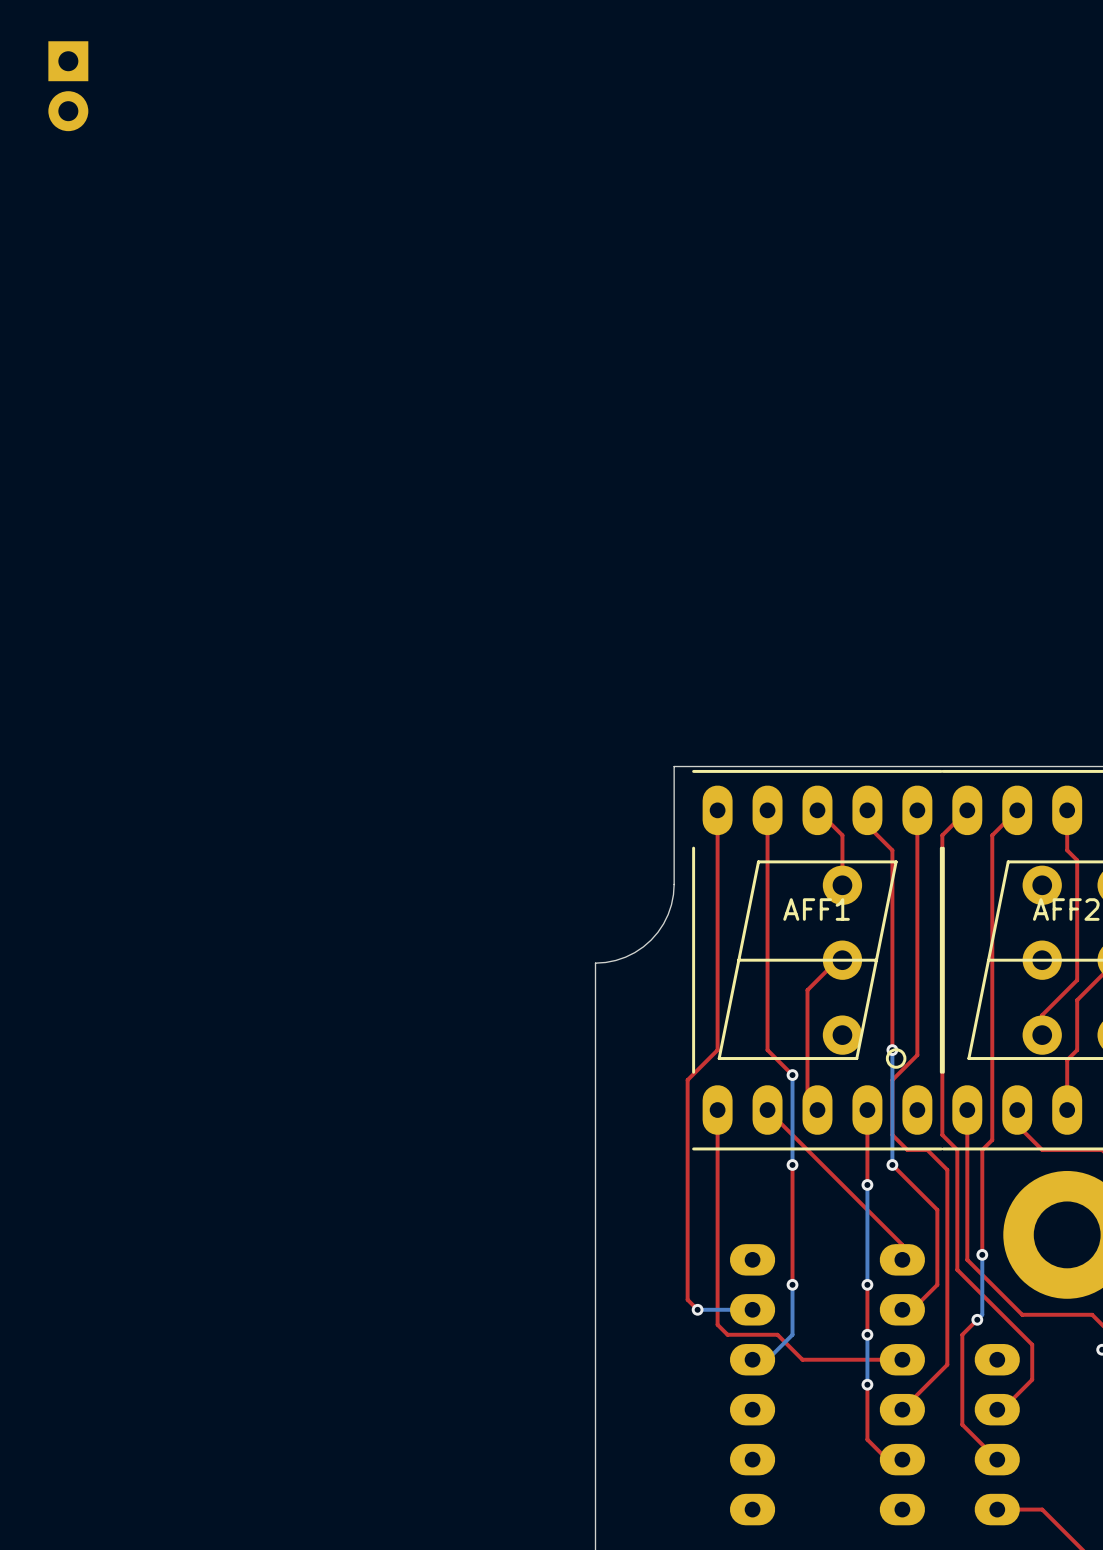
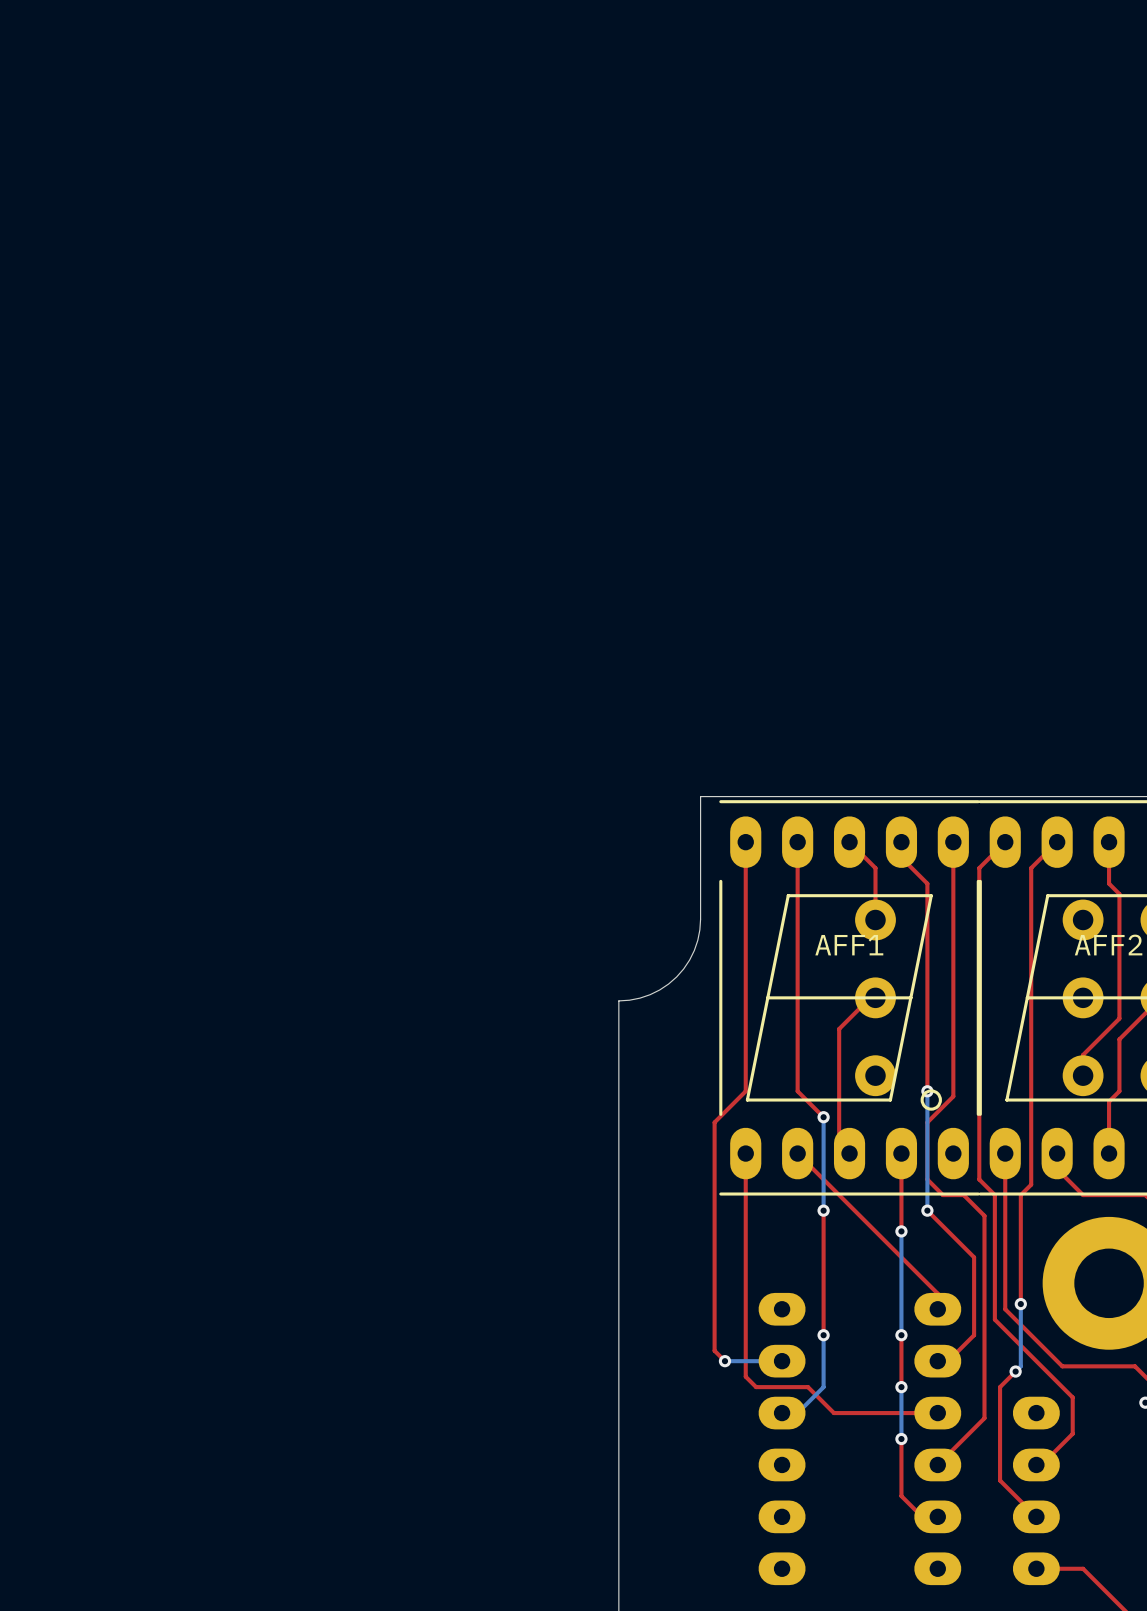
part: (68, 86) -> none

